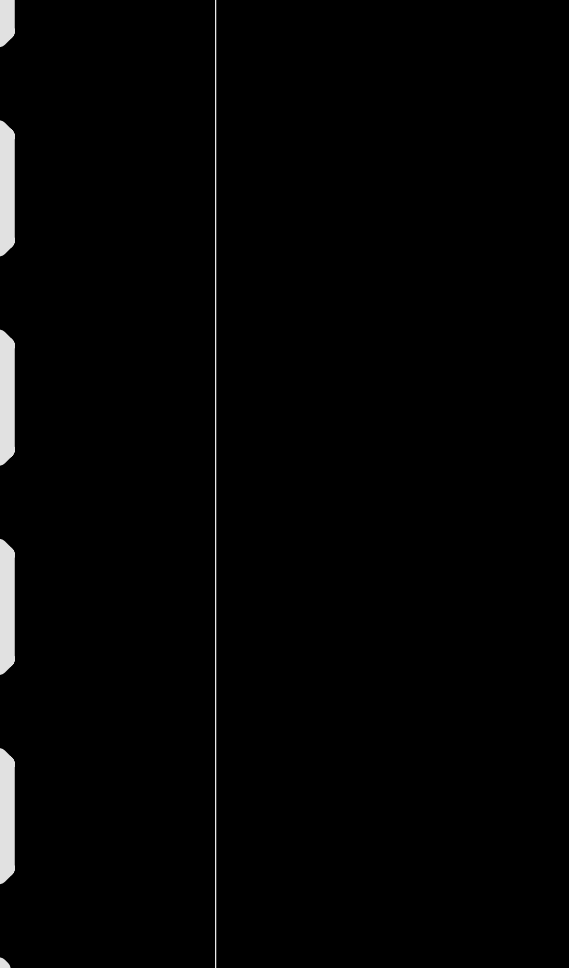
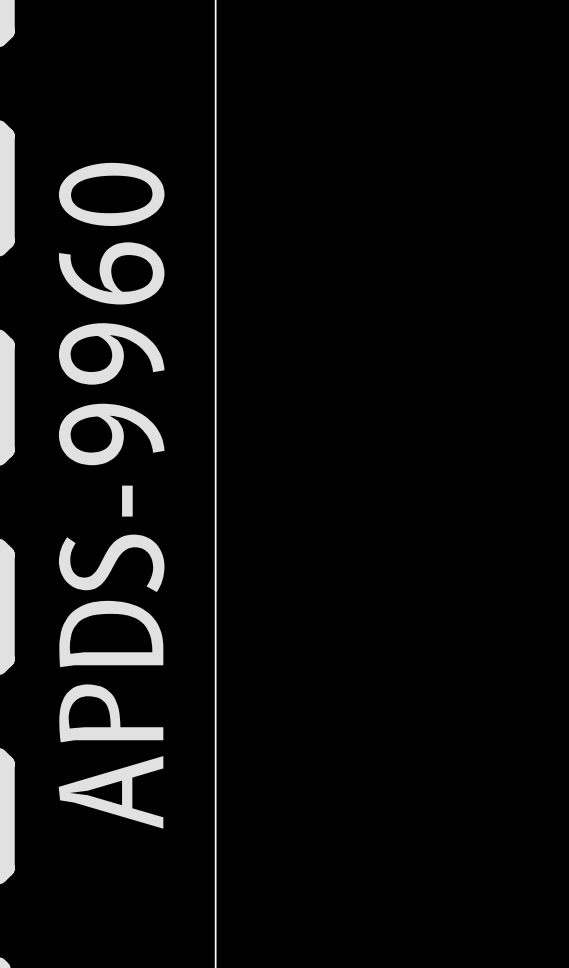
part value: none -> APDS-9960 (111, 495)

